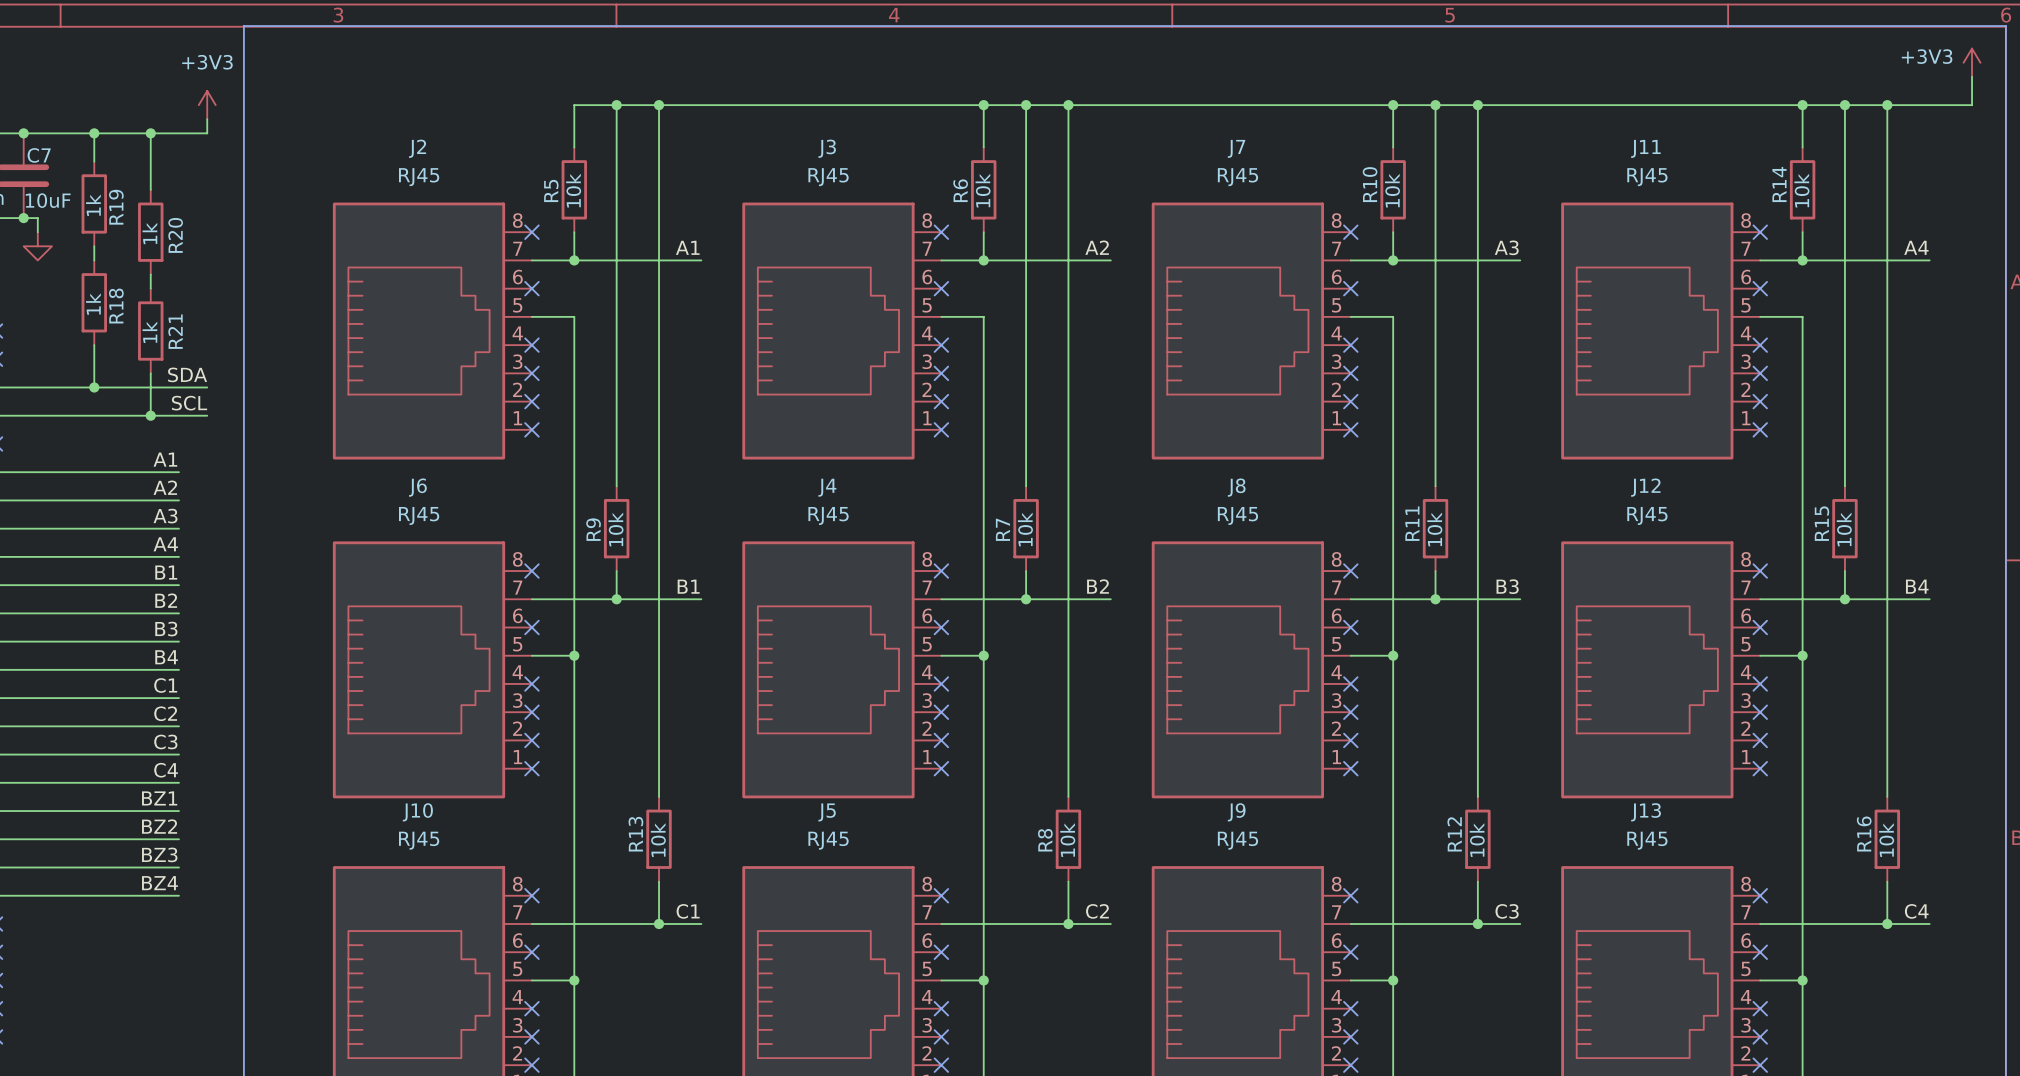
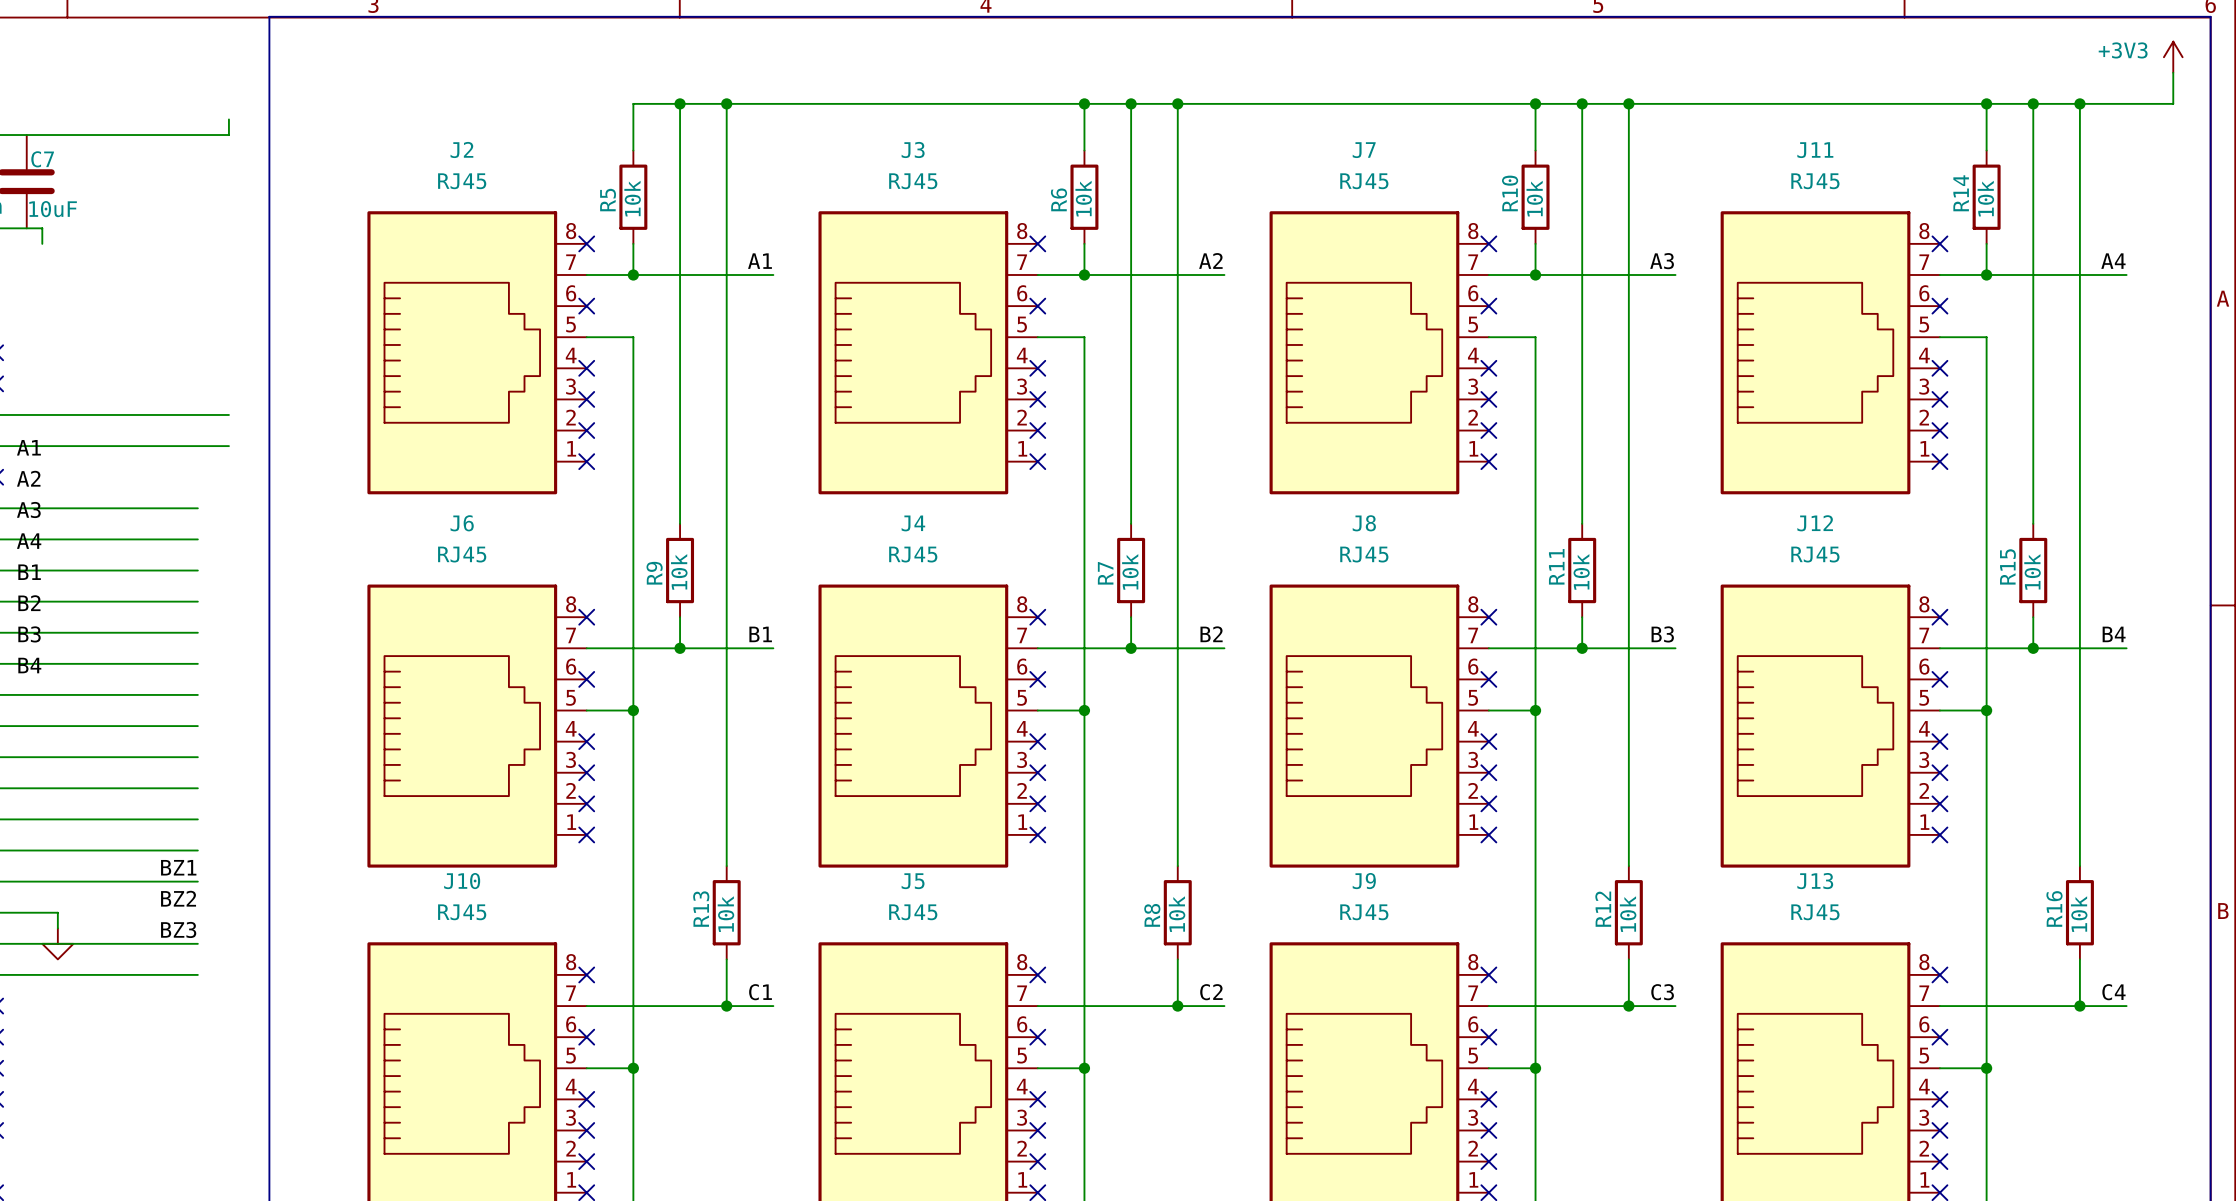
power symbol: +3V3 (207, 105) -> none
junction: (23, 133) -> none
wire: (94, 133) (94, 161) -> none
junction: (94, 133) -> none
wire: (150, 133) (150, 189) -> none
junction: (150, 133) -> none
R19: 1k (94, 203) -> none
junction: (23, 218) -> none
R20: 1k (150, 232) -> none
power symbol: (37, 246) -> none
wire: (94, 246) (94, 260) -> none
wire: (150, 274) (150, 288) -> none
R18: 1k (94, 302) -> none
R21: 1k (150, 331) -> none
wire: (94, 345) (94, 387) -> none
wire: (150, 373) (150, 415) -> none
label: SDA (187, 374) -> none
junction: (94, 387) -> none
label: SCL (189, 403) -> none
junction: (150, 415) -> none
label position: A1 (165, 459) -> A1 (28, 447)
label position: A2 (165, 487) -> A2 (28, 478)
label position: A3 (165, 516) -> A3 (28, 510)
label position: A4 (165, 544) -> A4 (29, 541)
label position: B1 (166, 572) -> B1 (29, 572)
label position: B2 (166, 600) -> B2 (29, 603)
label position: B3 (166, 629) -> B3 (29, 634)
label position: B4 (166, 657) -> B4 (29, 665)
label: C1 (165, 685) -> none
label: C2 (165, 713) -> none
label: C3 (165, 741) -> none
label: C4 (166, 770) -> none
wire: (51, 839) (178, 839) -> (57, 912) (57, 928)
power symbol: none -> (57, 943)
label: BZ4 (159, 883) -> none

